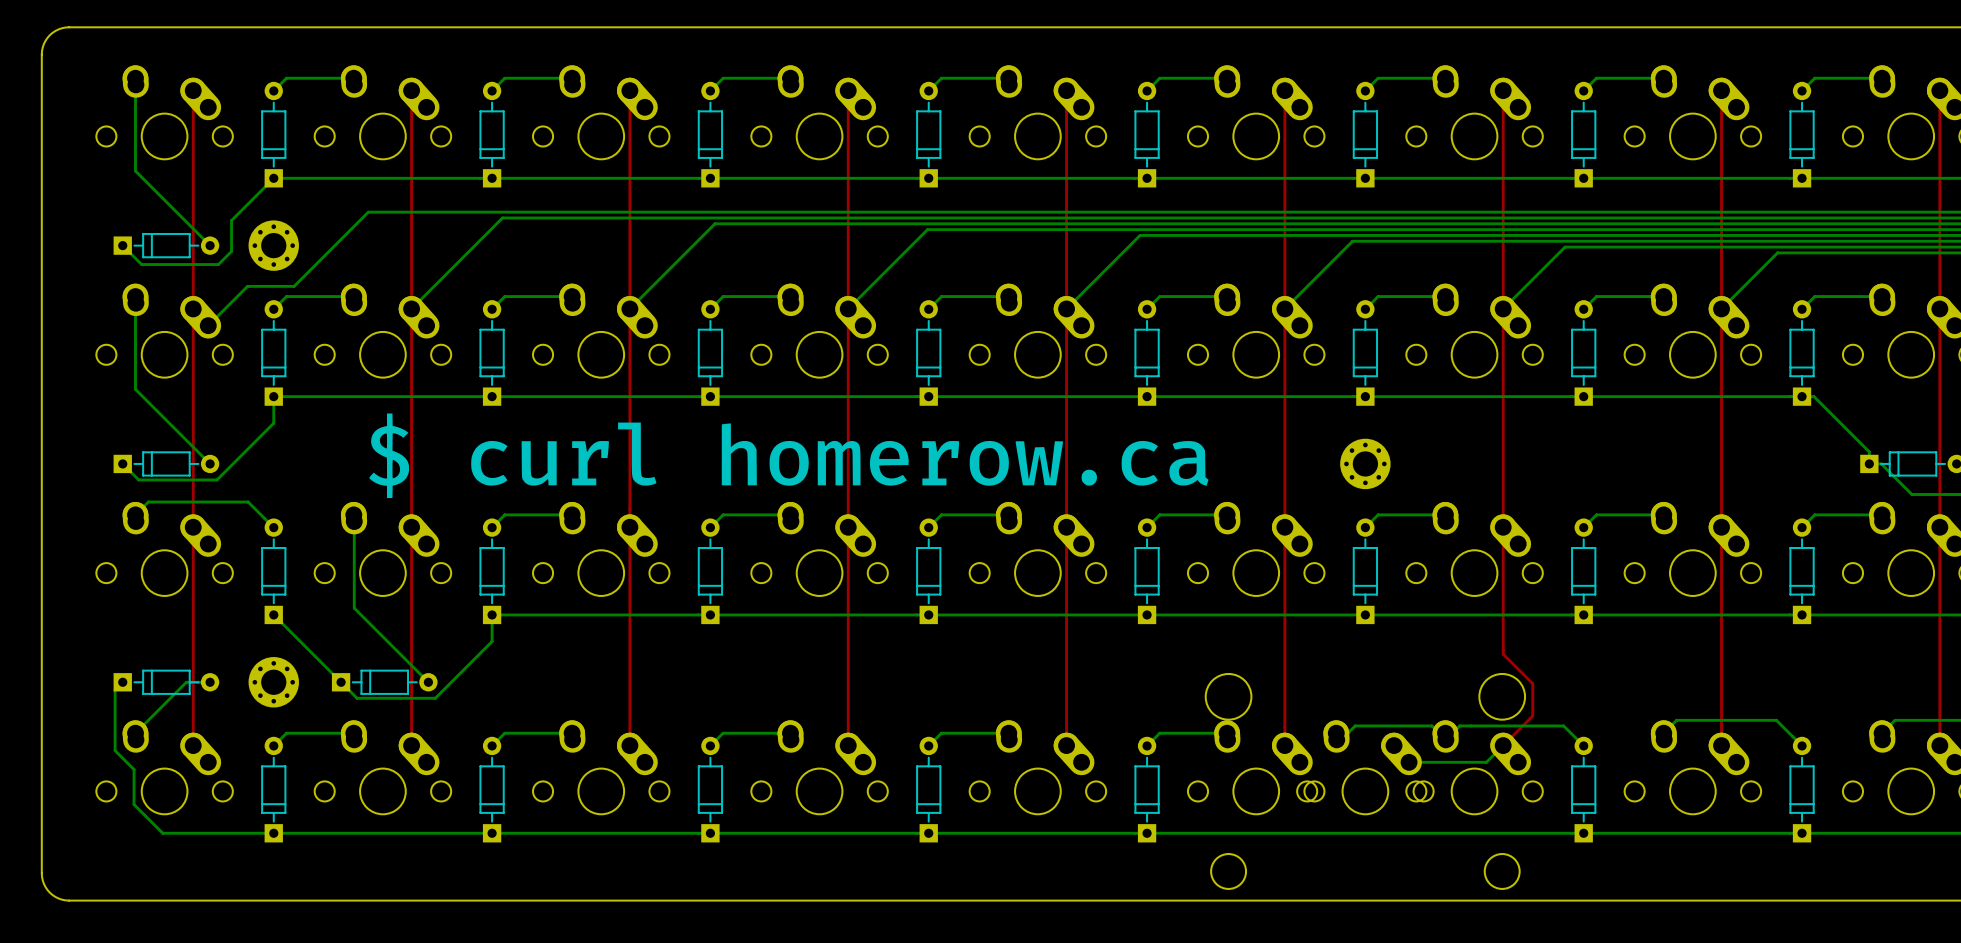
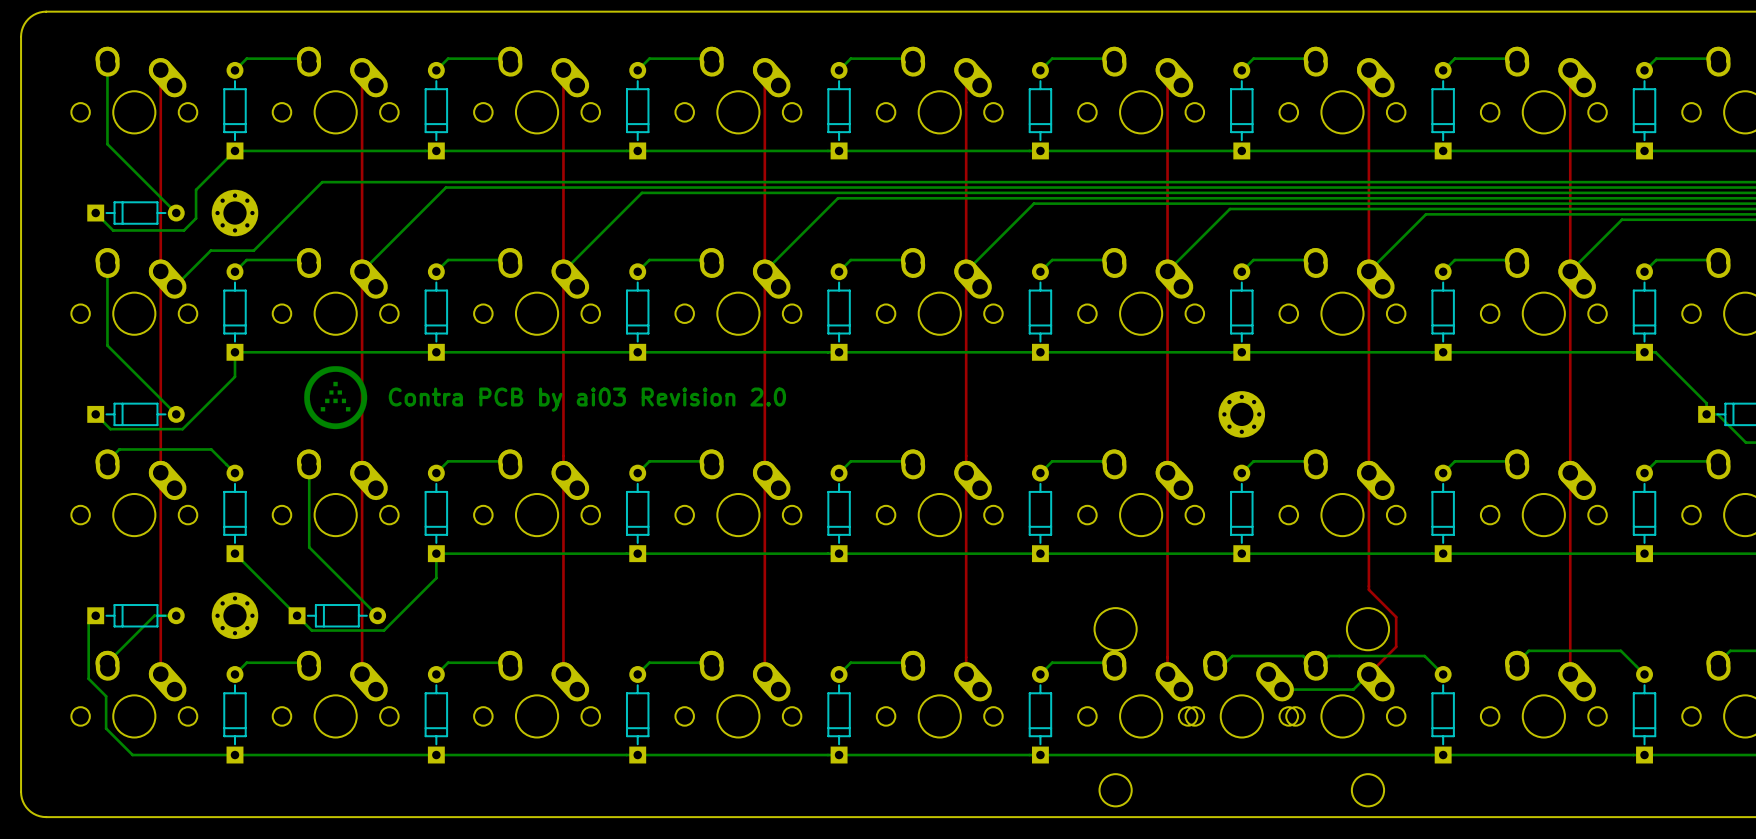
drawing: none -> [304, 366, 368, 430]
drawing: [369, 413, 1209, 499] -> none
text: none -> Contra PCB by ai03 Revision 2.0 (587, 399)

